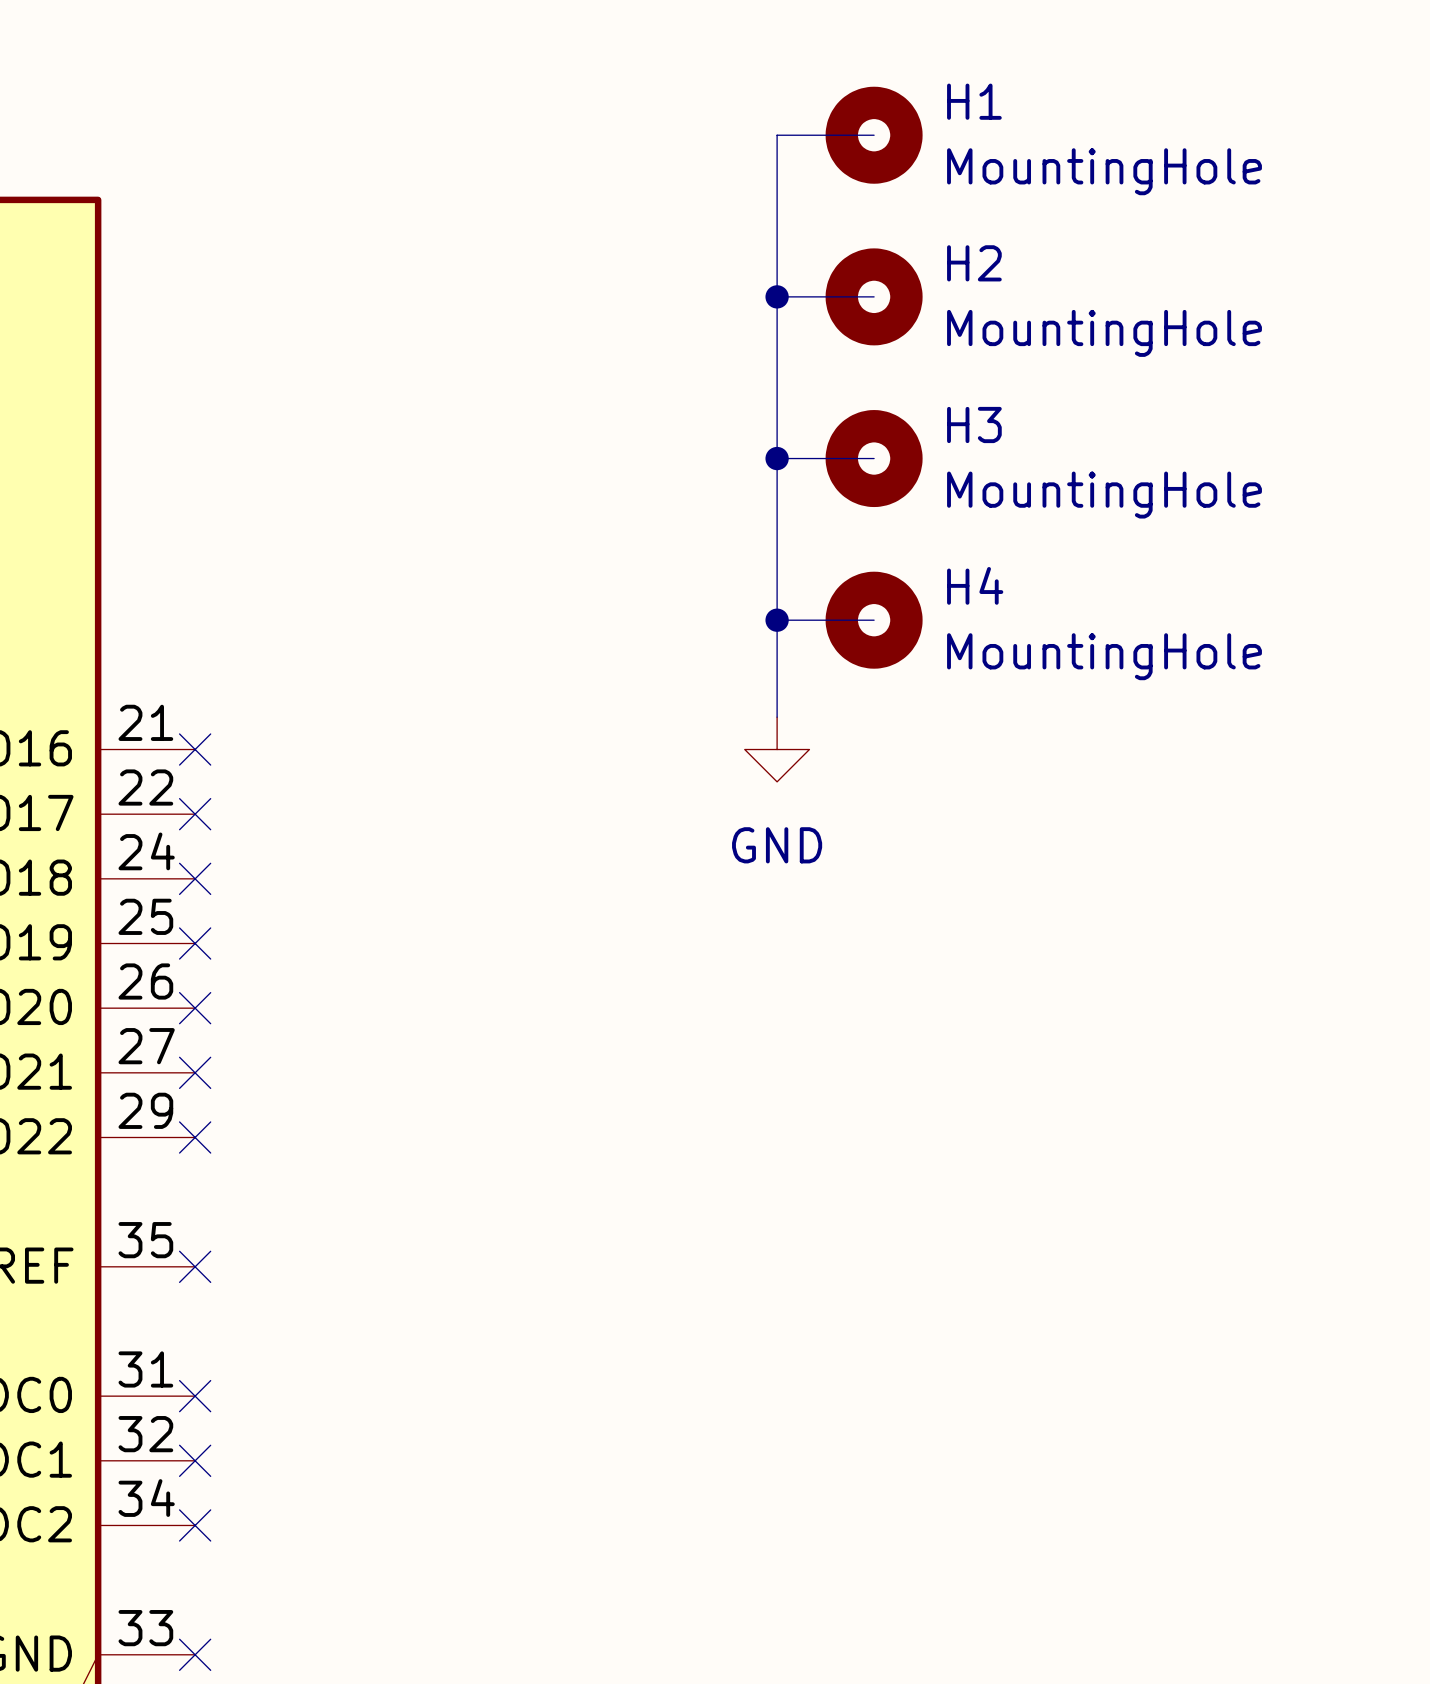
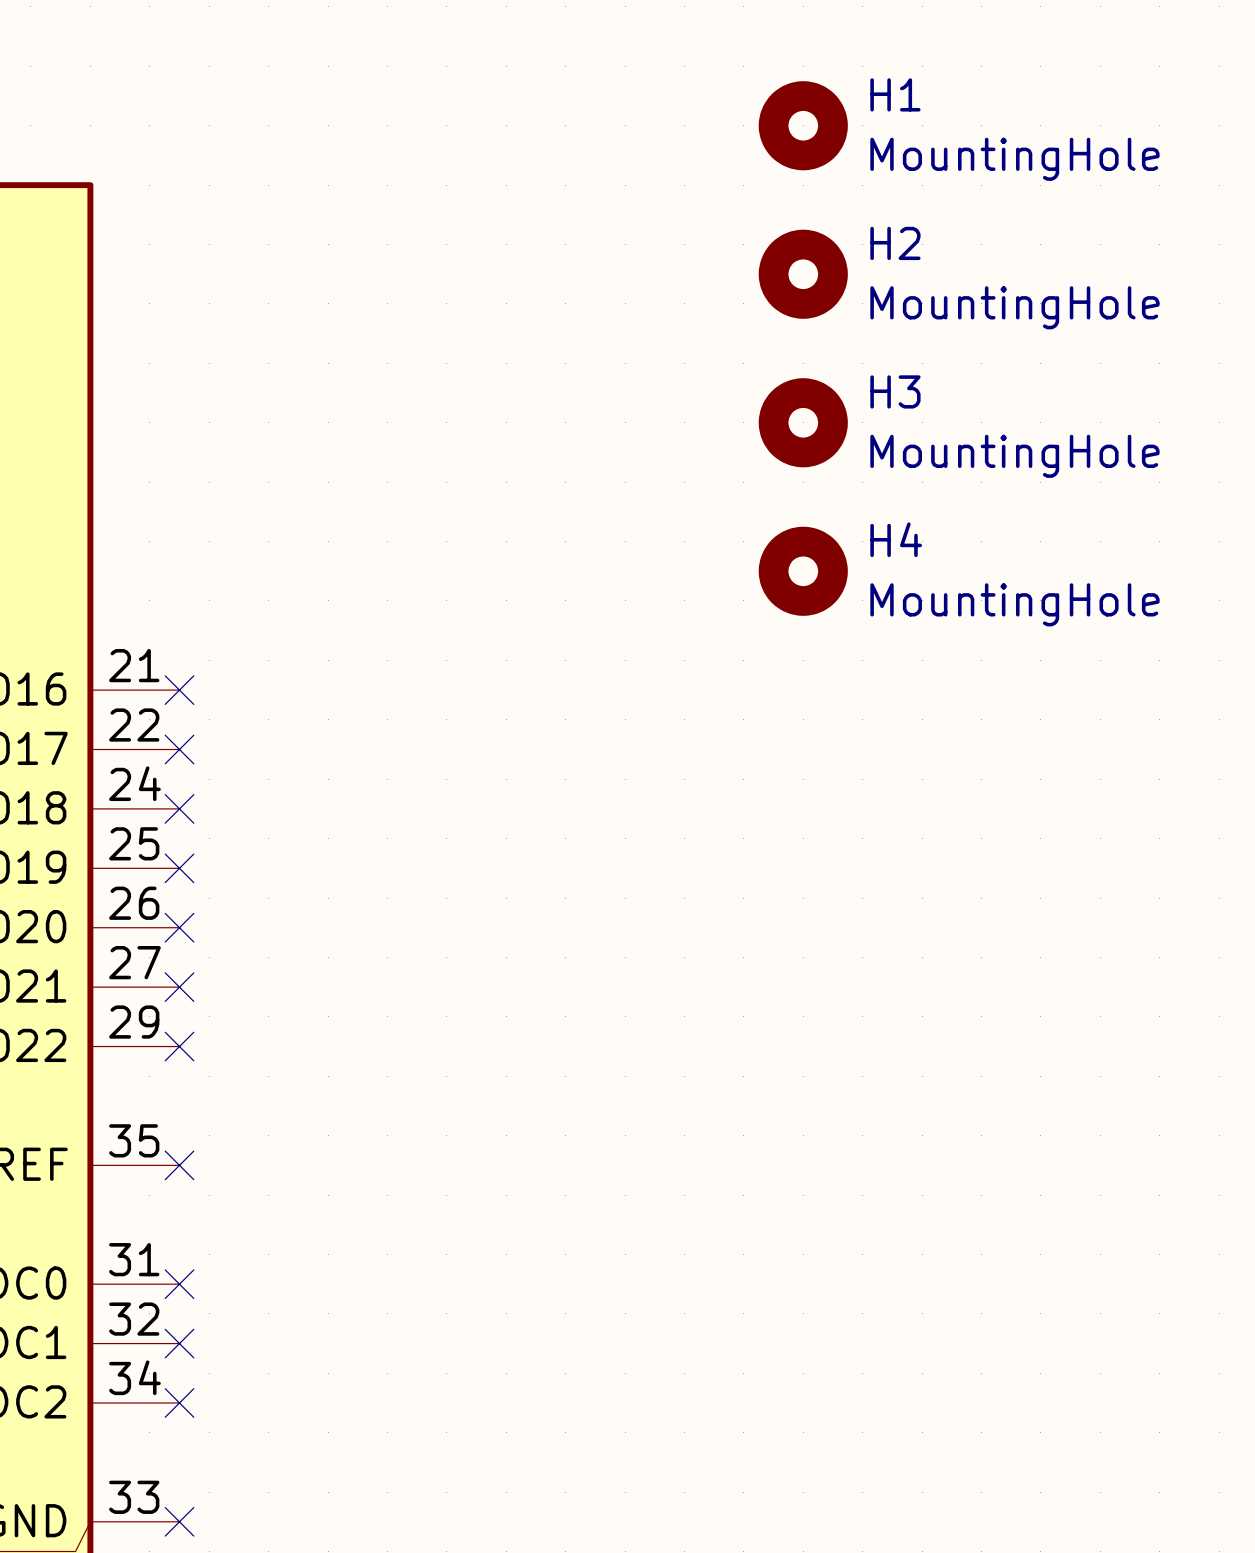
wire: (874, 135) (777, 135) (777, 717) -> none
wire: (777, 296) (874, 296) -> none
junction: (777, 296) -> none
wire: (777, 458) (874, 458) -> none
junction: (777, 458) -> none
wire: (777, 620) (874, 620) -> none
junction: (777, 620) -> none
power symbol: GND (777, 749) -> none

